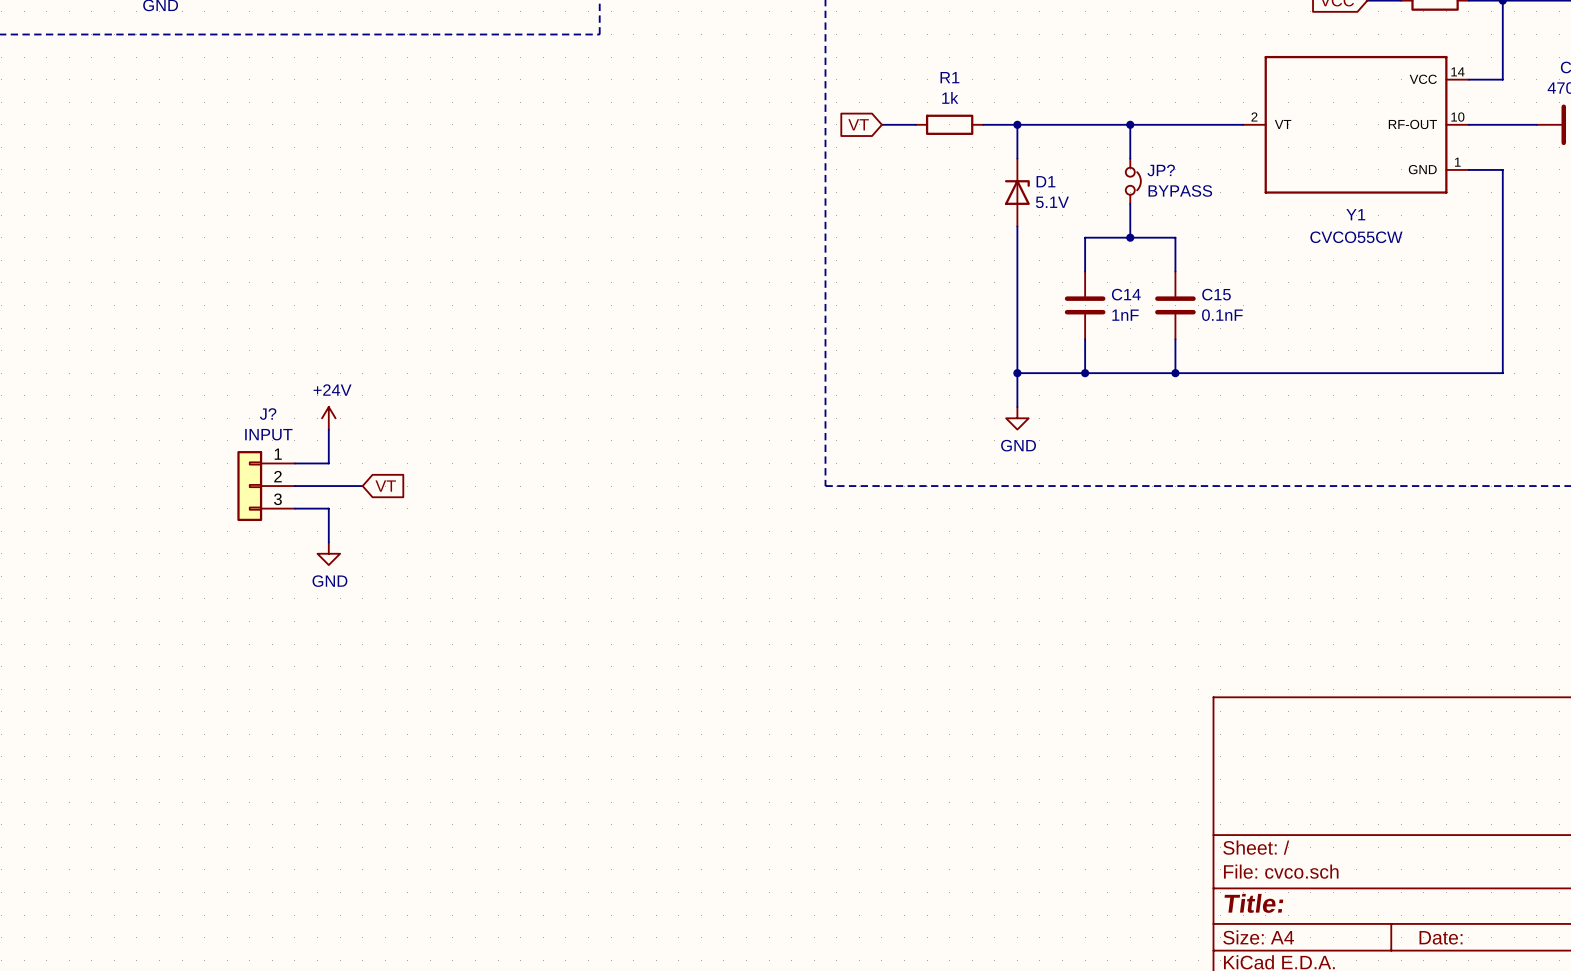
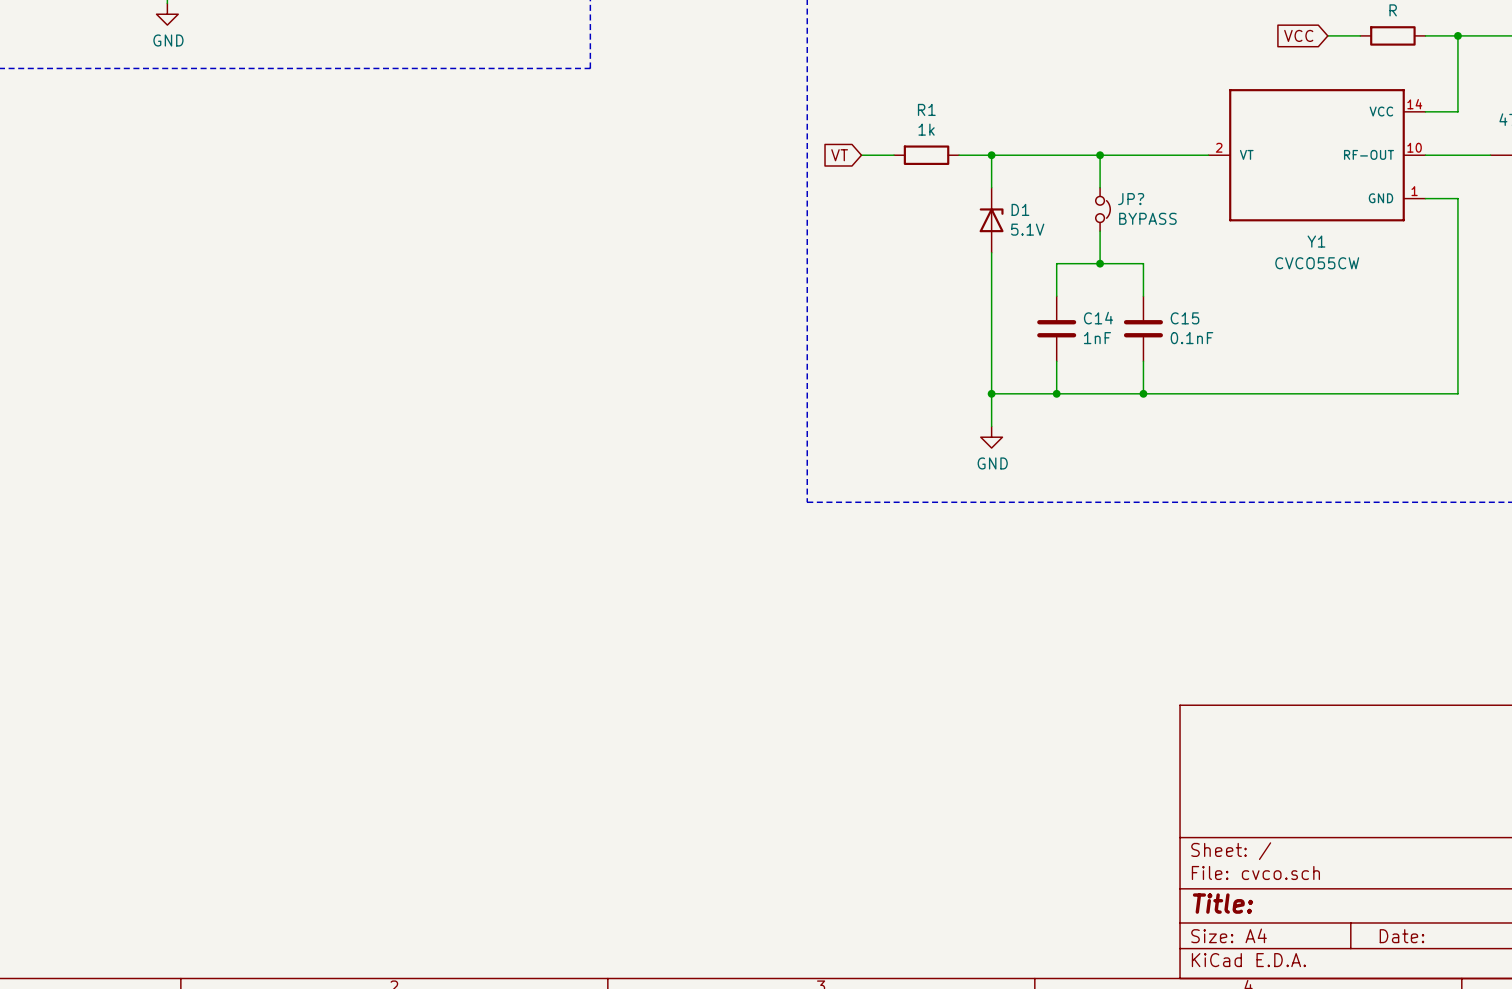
power symbol: +24V (328, 418) -> none
wire: (328, 429) (328, 463) (294, 463) -> none
J?: INPUT (266, 486) -> none
wire: (294, 486) (362, 486) -> none
global label: VT (385, 486) -> none
wire: (294, 508) (328, 508) (328, 542) -> none
power symbol: GND (328, 553) -> none

